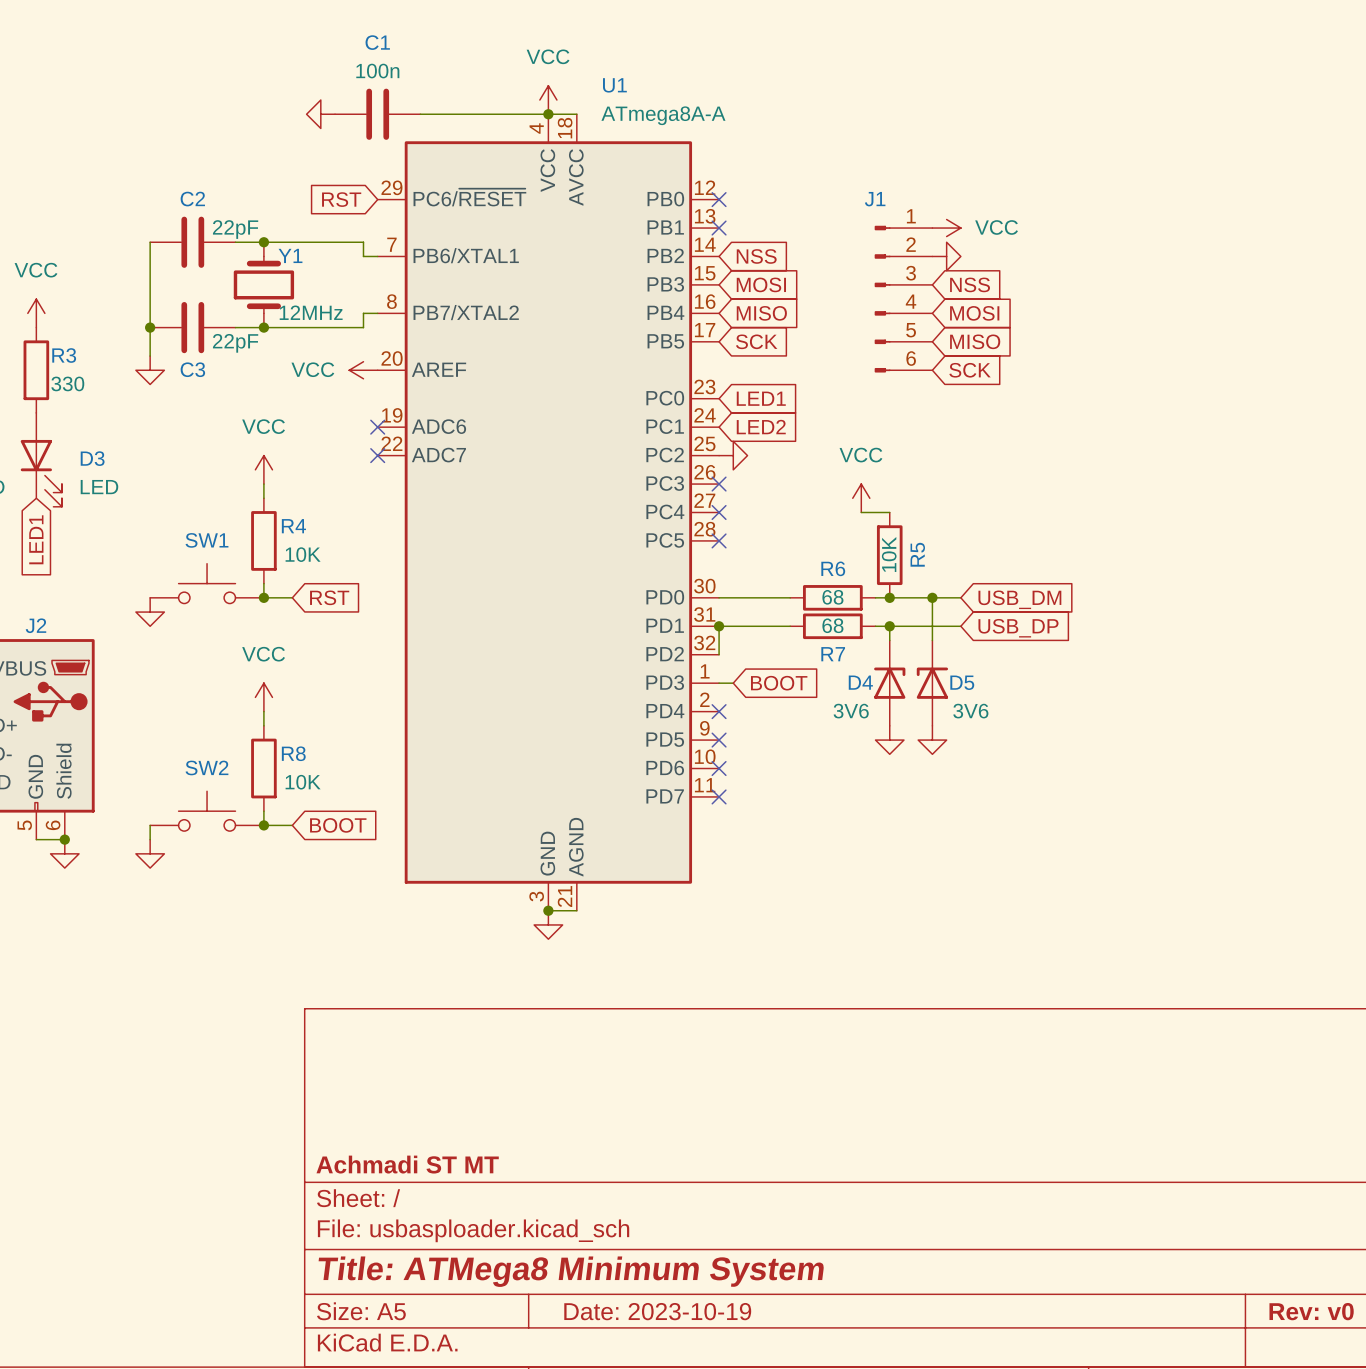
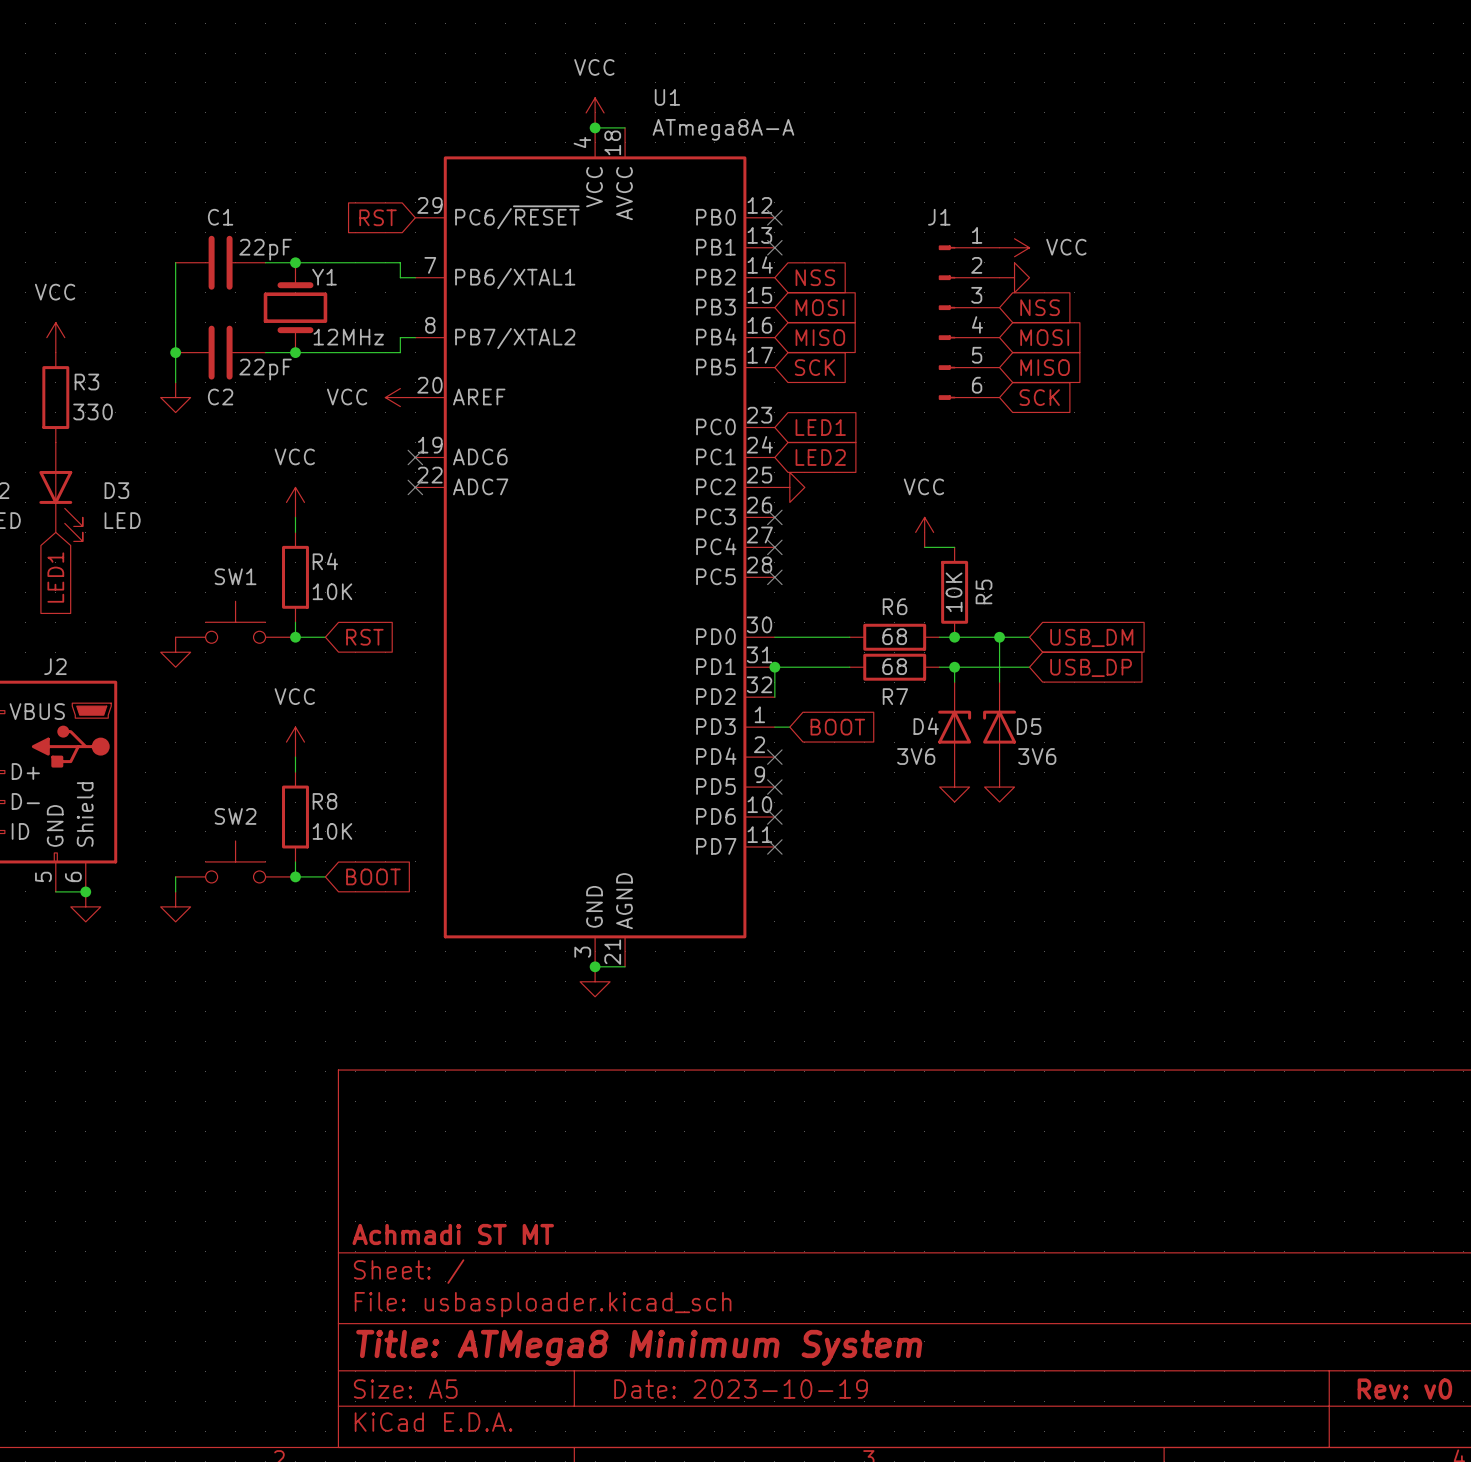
power symbol: (320, 114) -> none
C1: 100n (377, 114) -> none
wire: (420, 114) (548, 114) -> none
C2 name: C2 (192, 199) -> C1 (220, 217)
C3 name: C3 (192, 369) -> C2 (220, 397)

